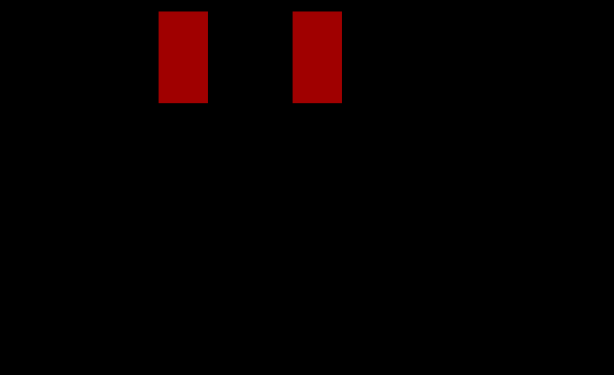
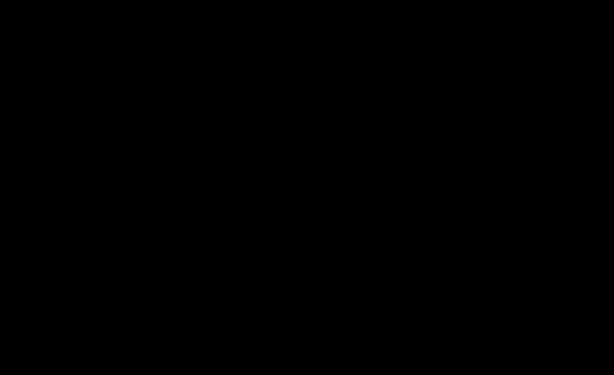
part: (250, 57) -> none

